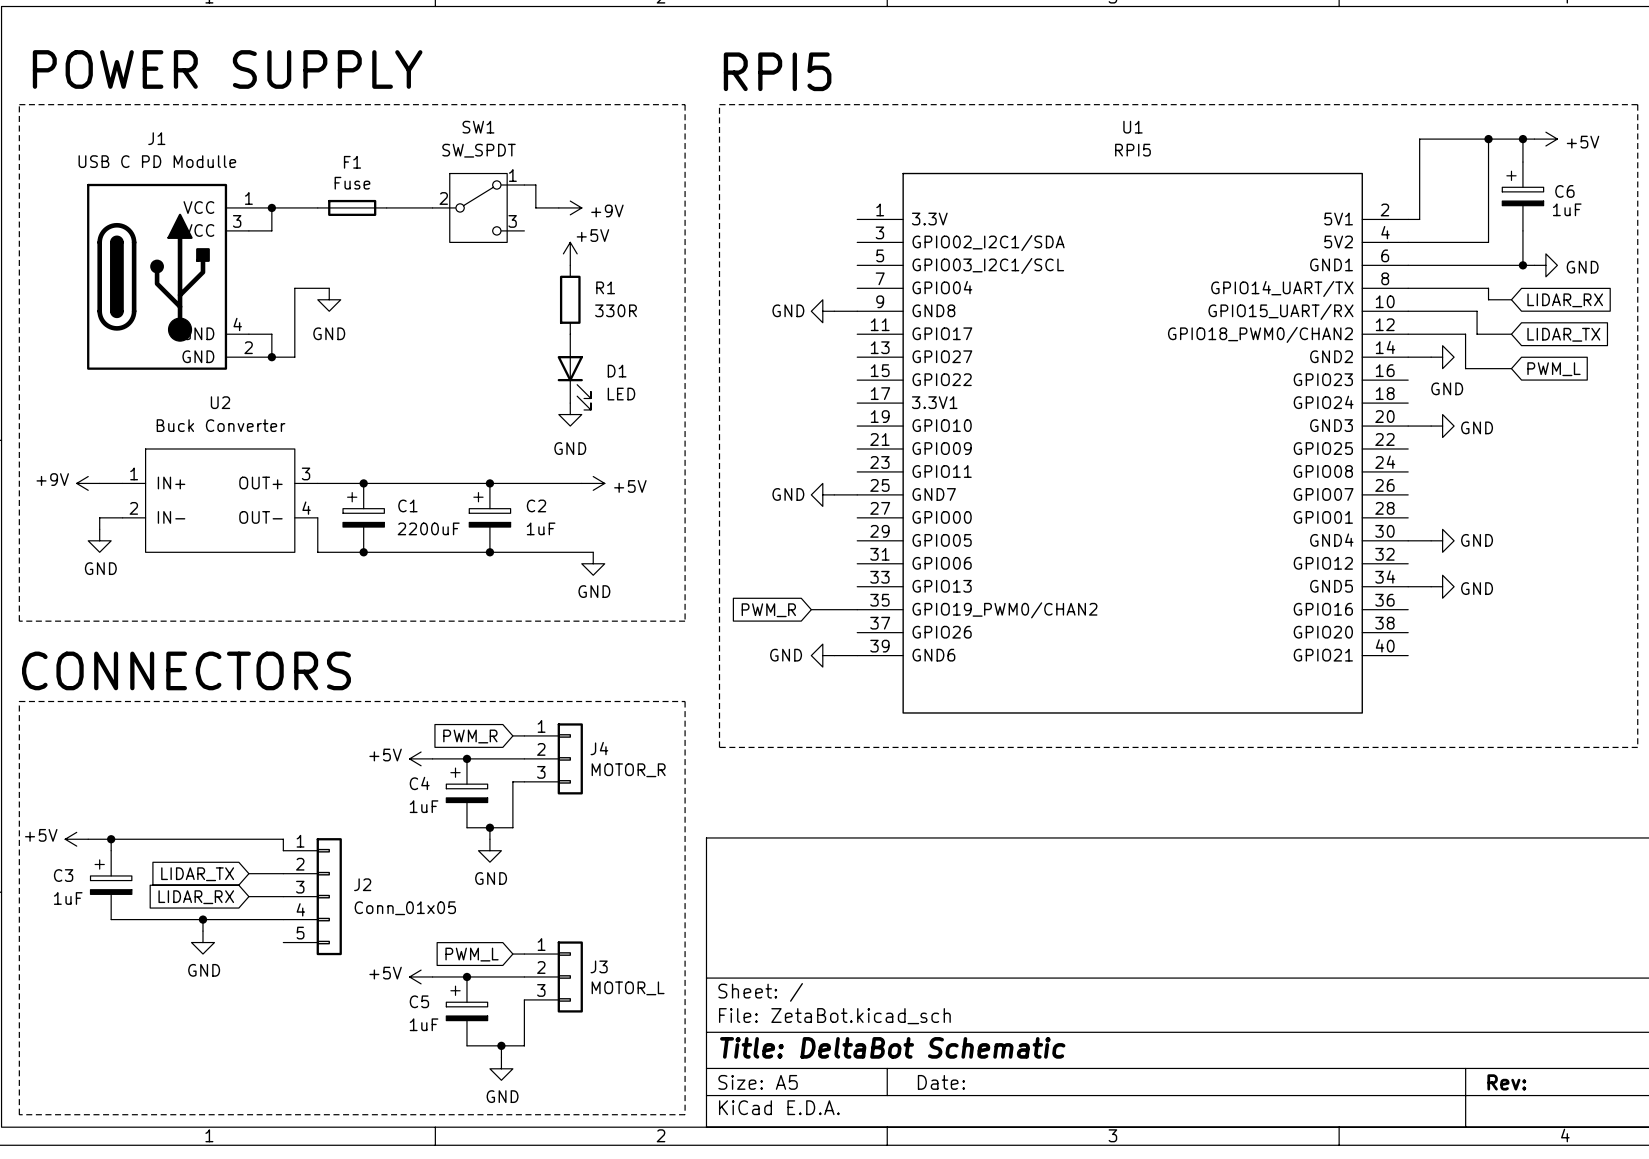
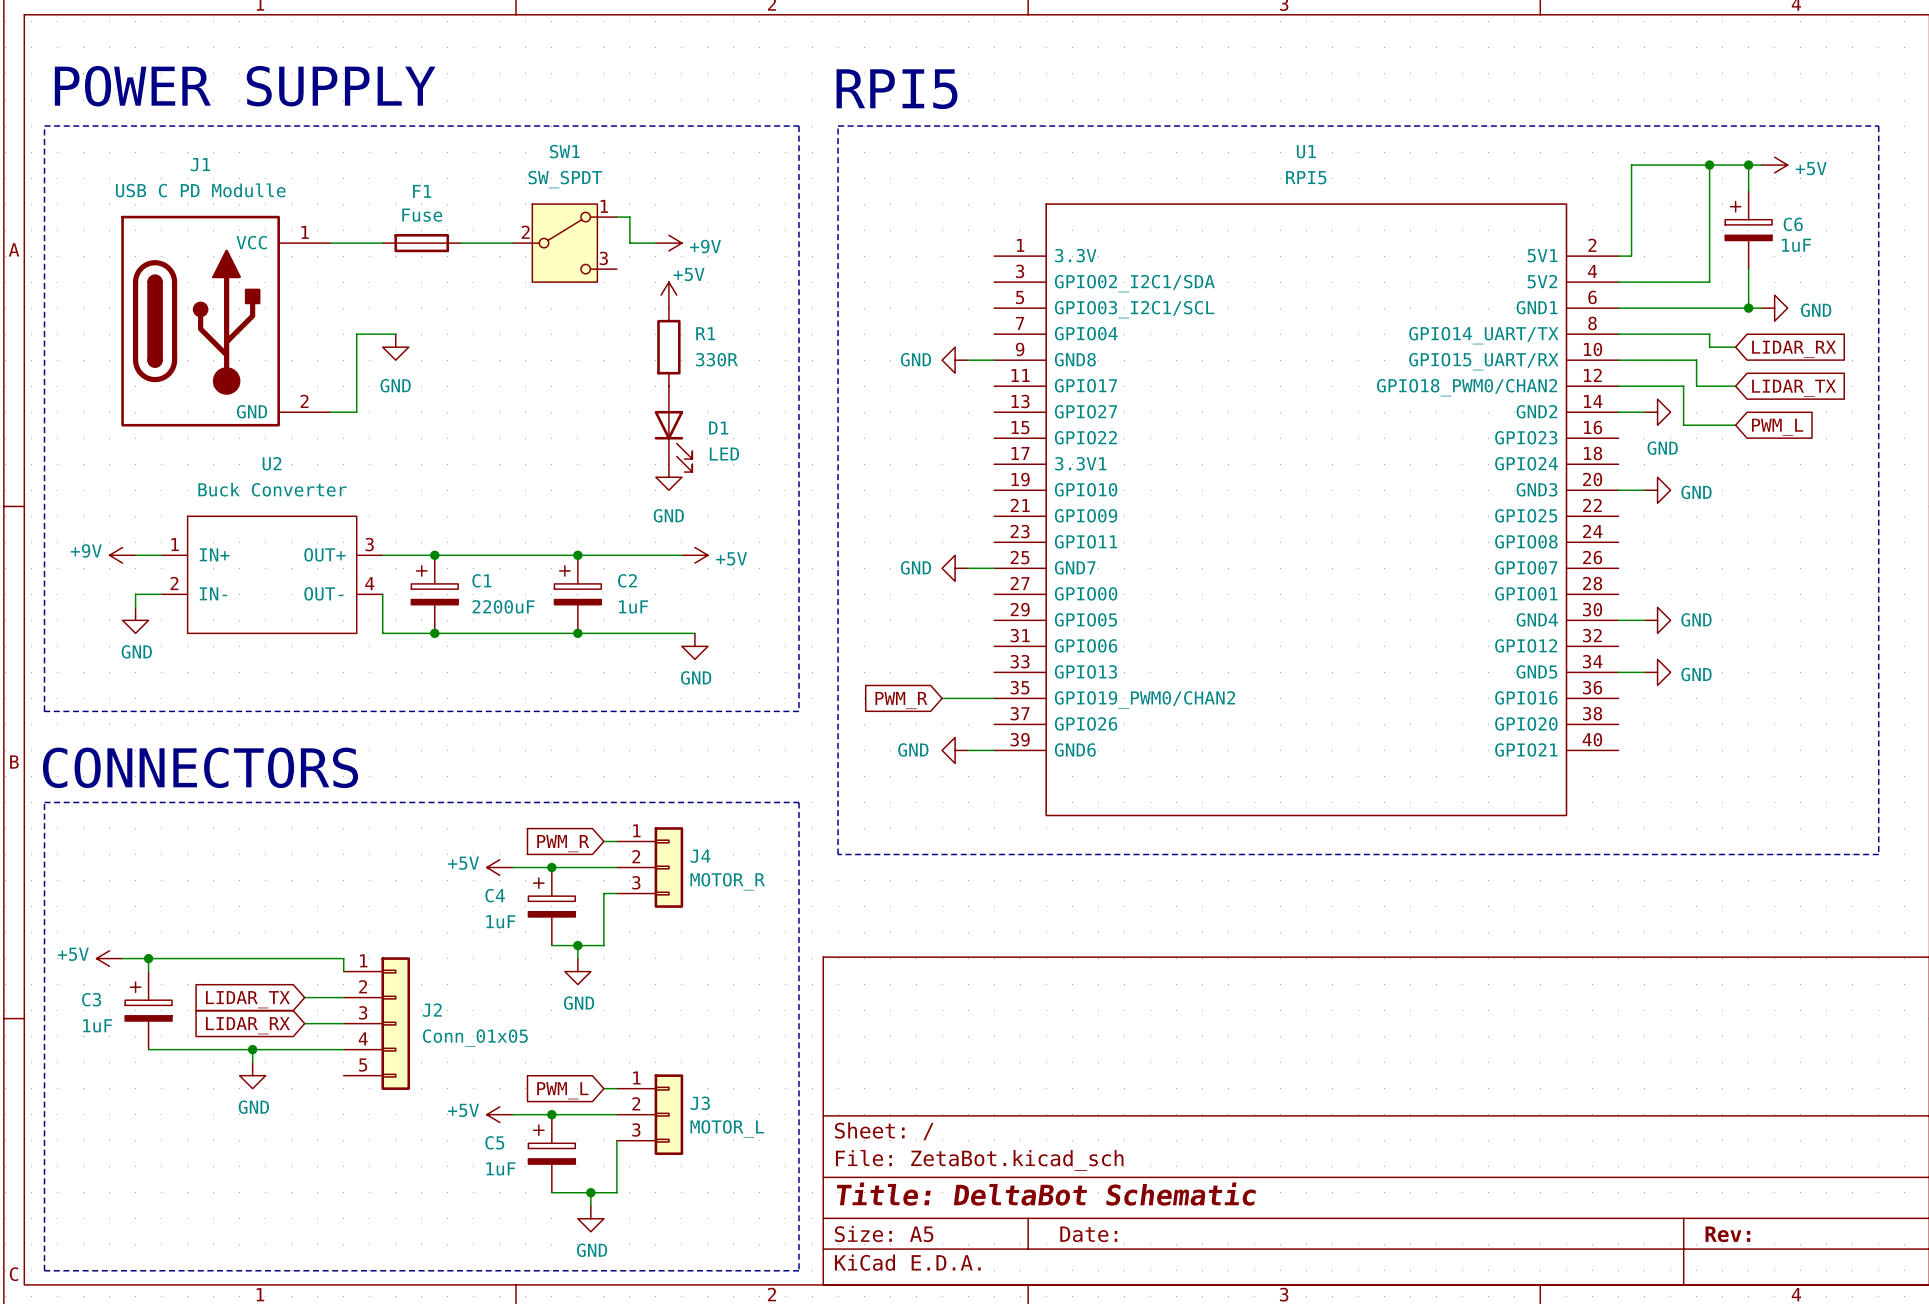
J1 symbol: [87, 183, 272, 370] -> [121, 215, 331, 427]
wire: (271, 207) (271, 230) (248, 230) -> none
junction: (271, 207) -> none
wire: (248, 334) (271, 334) (271, 357) -> none
junction: (271, 357) -> none

